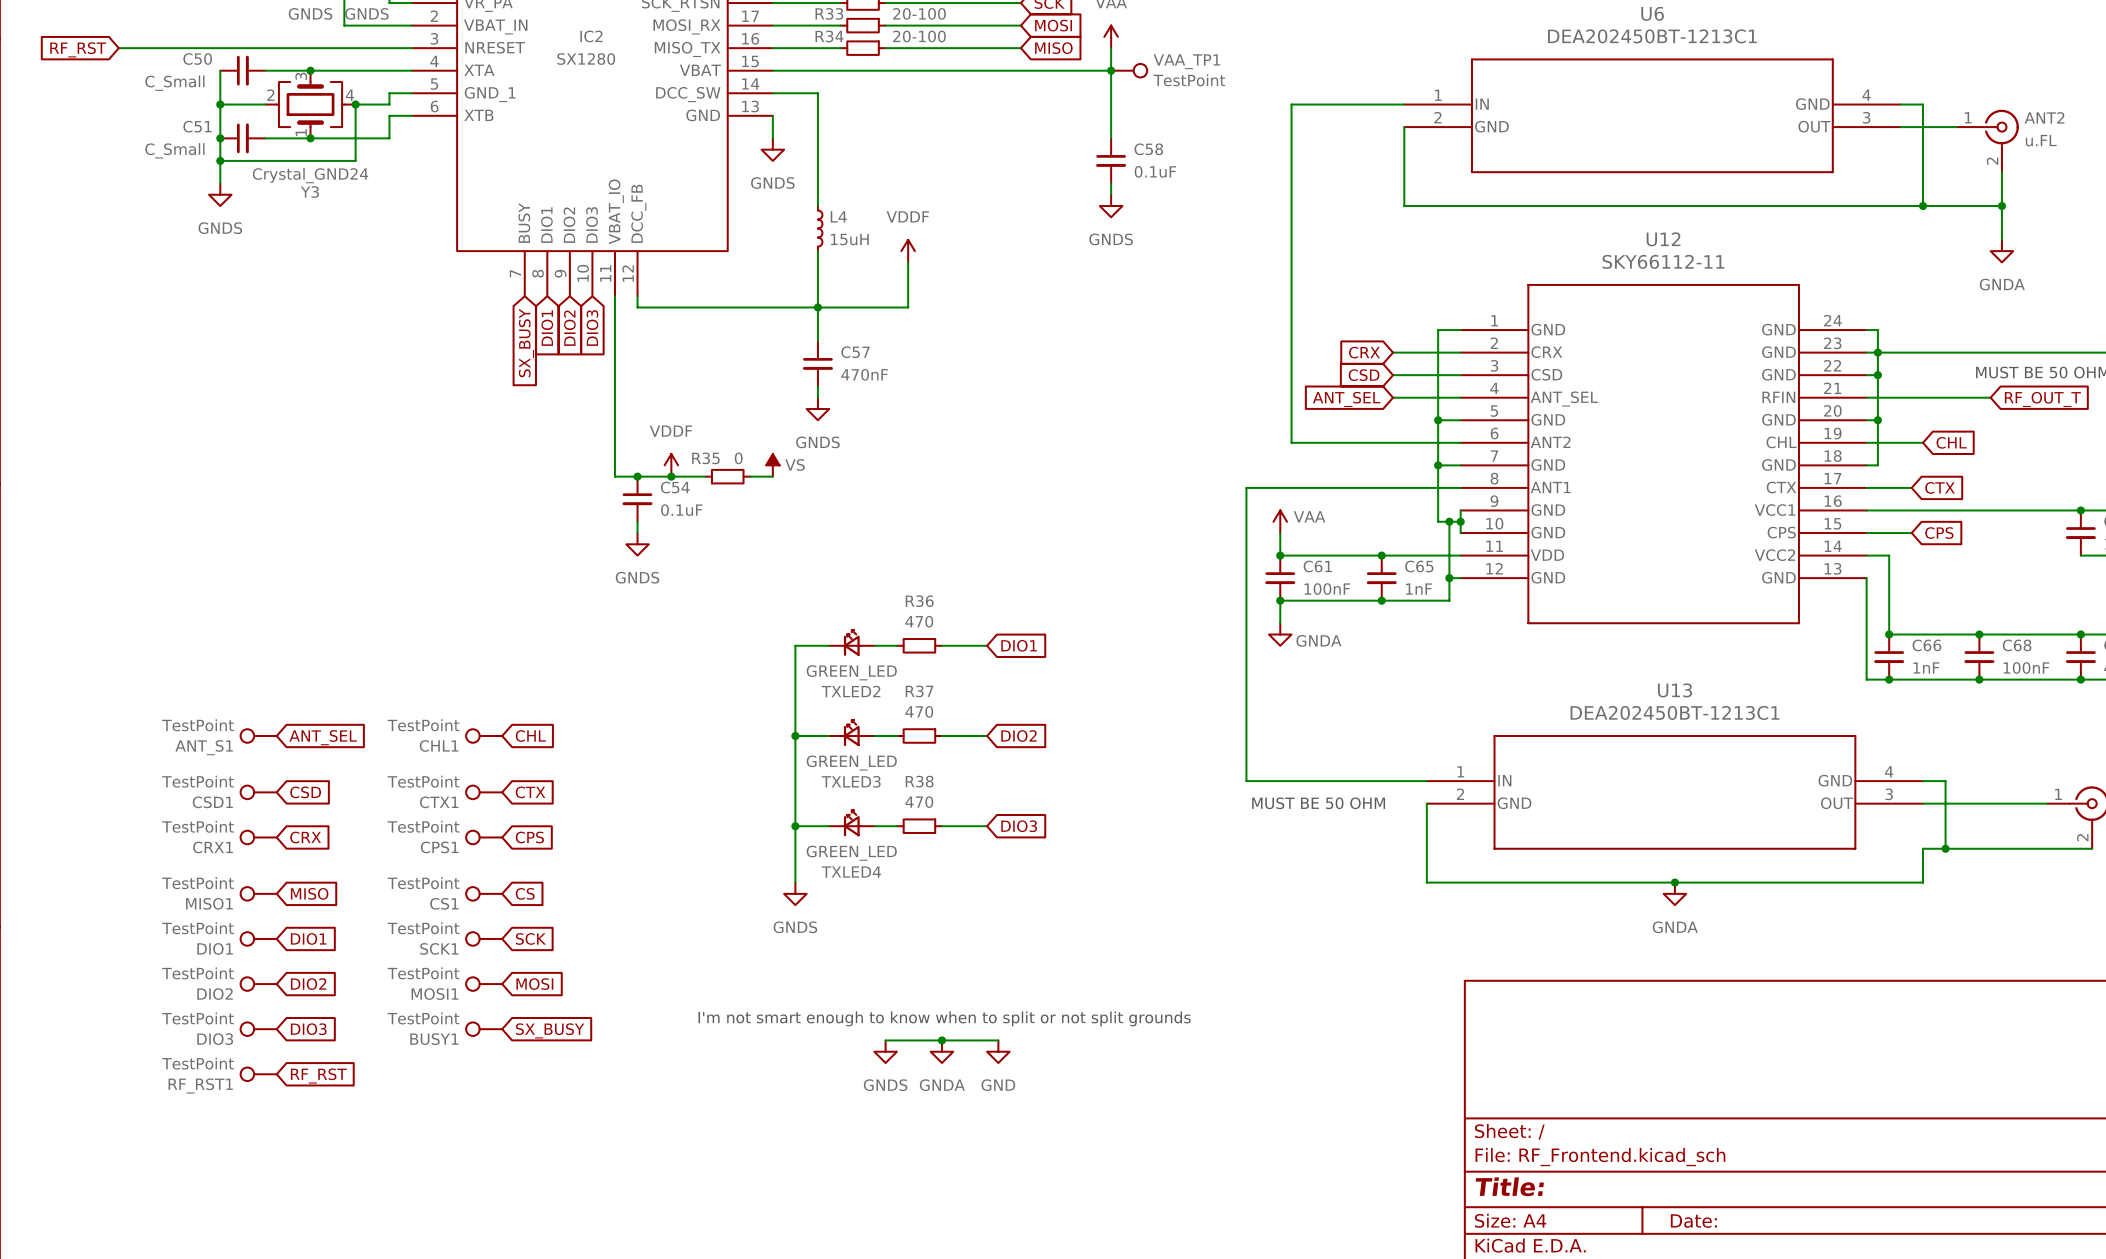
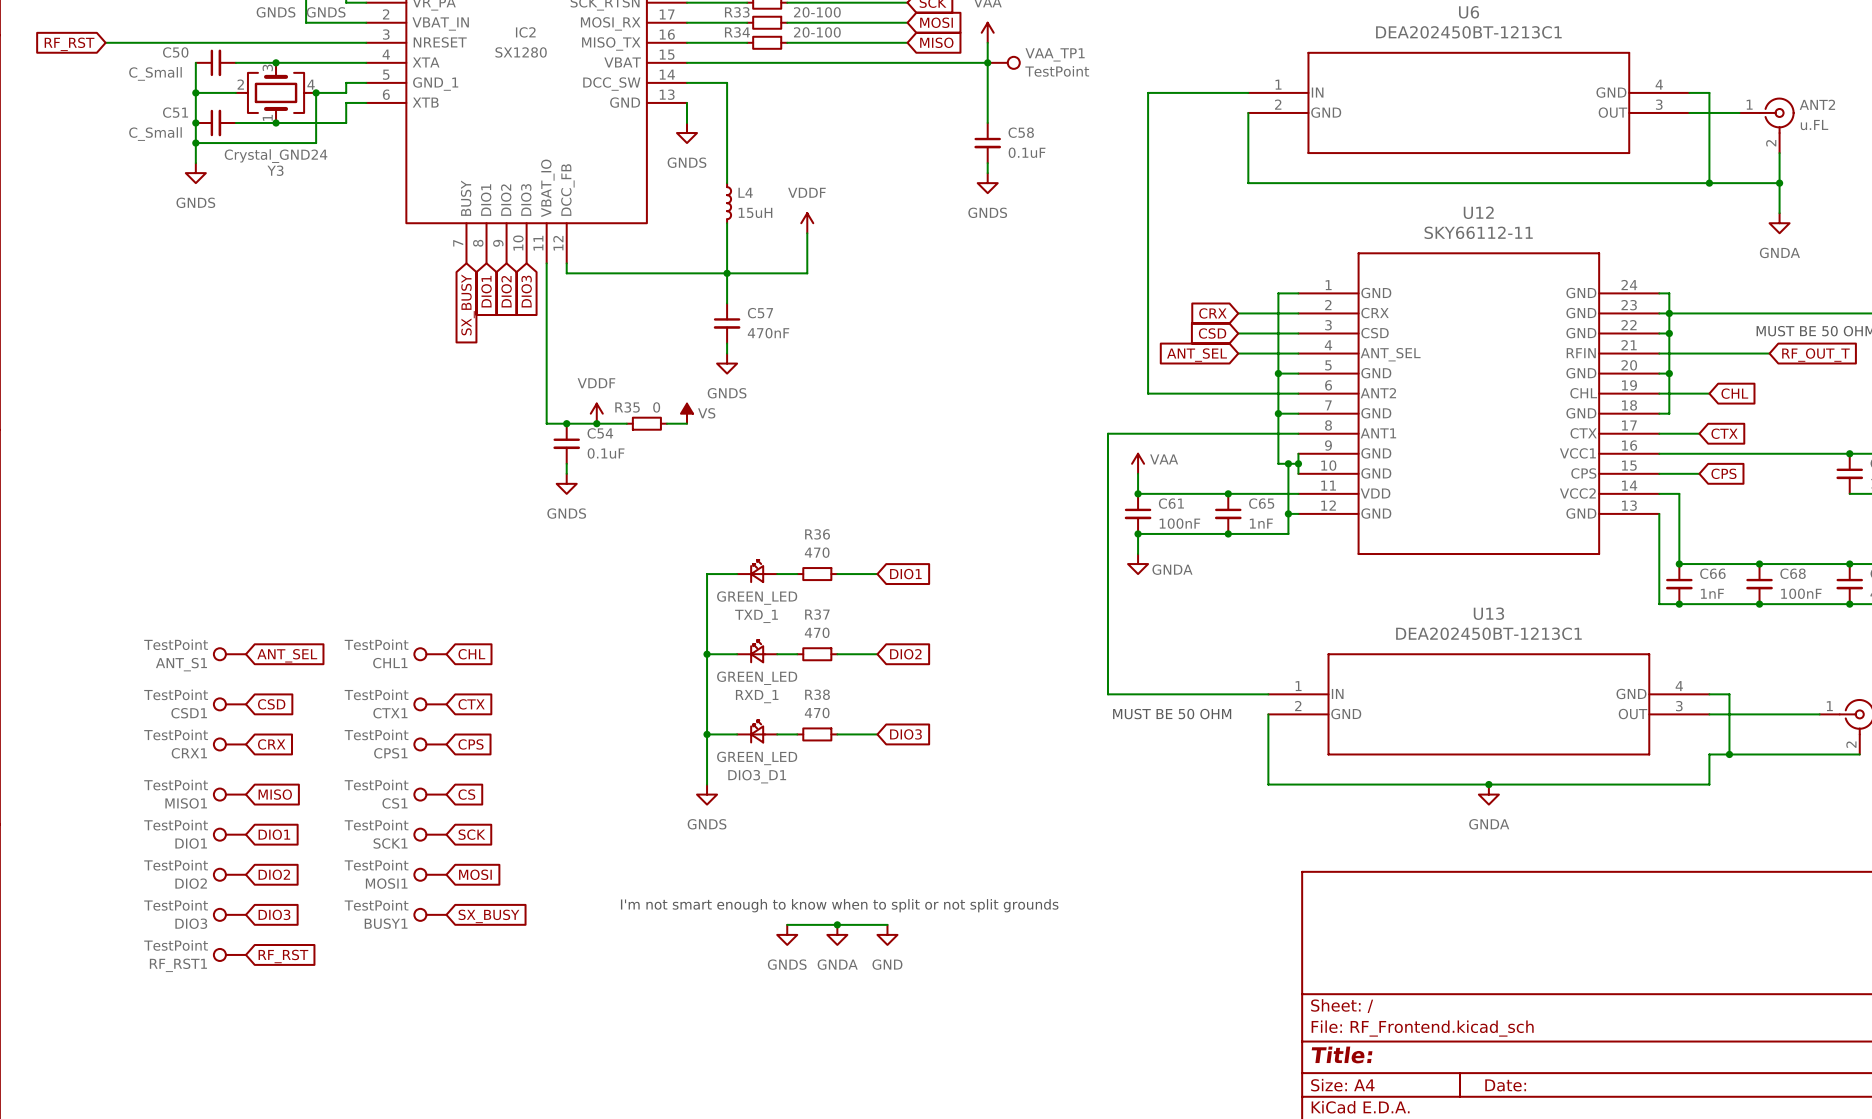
TXLED2 name: TXLED2 (850, 691) -> TXD_1 (756, 616)
TXLED3 name: TXLED3 (851, 781) -> RXD_1 (757, 696)
TXLED4 name: TXLED4 (851, 872) -> DIO3_D1 (757, 776)

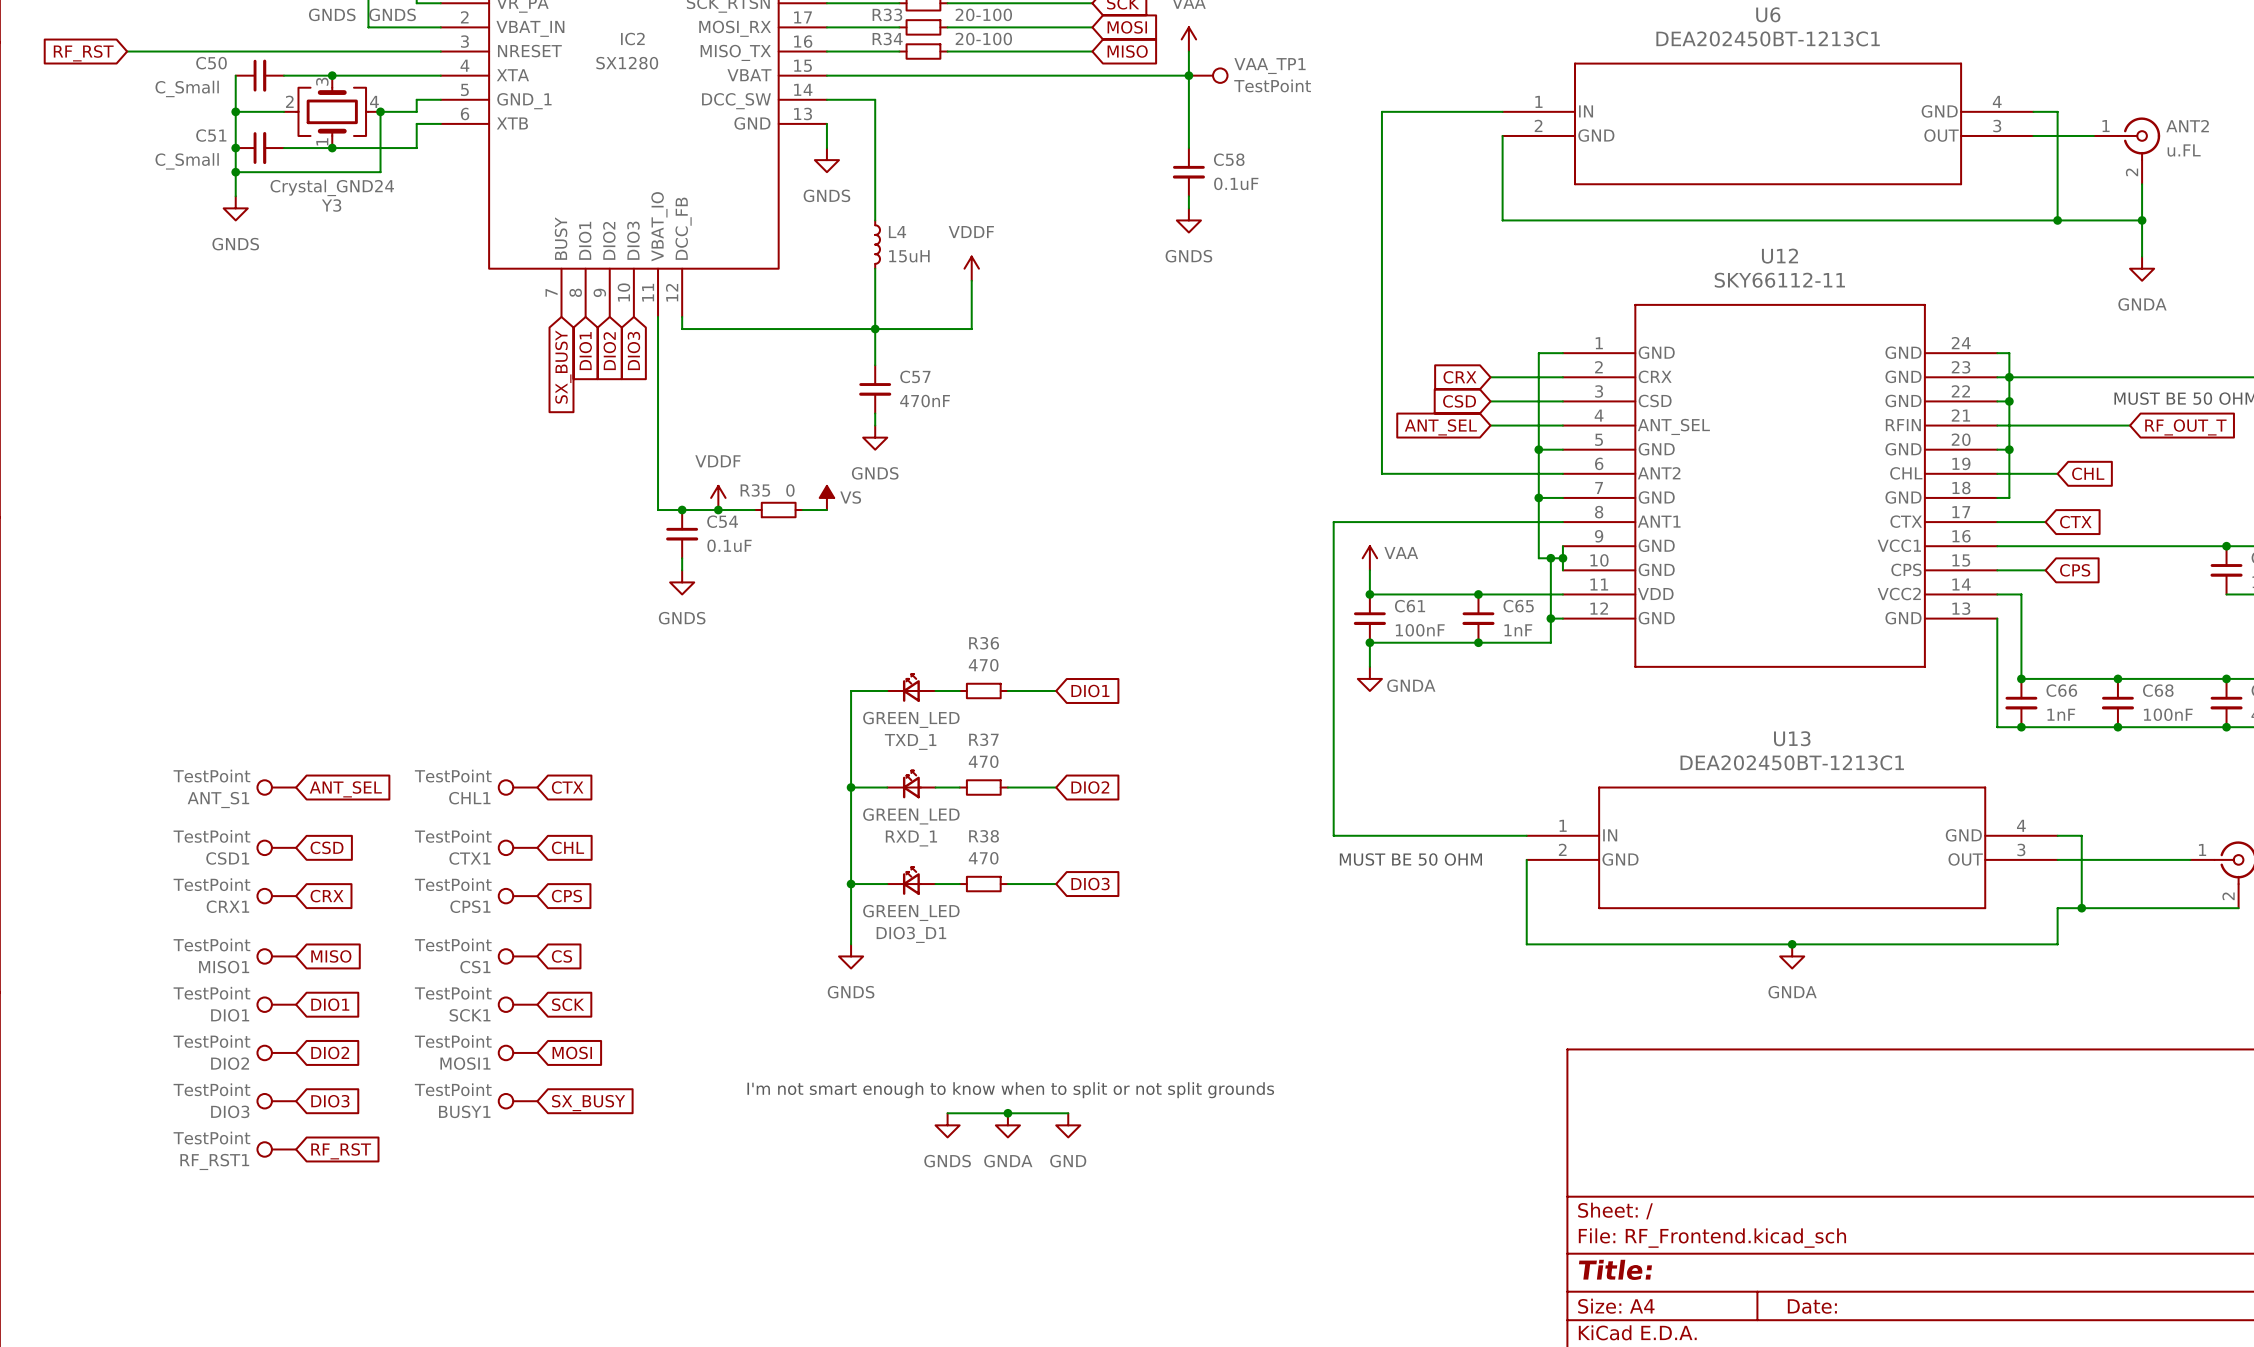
global label: CHL (471, 654) -> CTX (567, 787)
global label: CTX (471, 704) -> CHL (567, 847)

